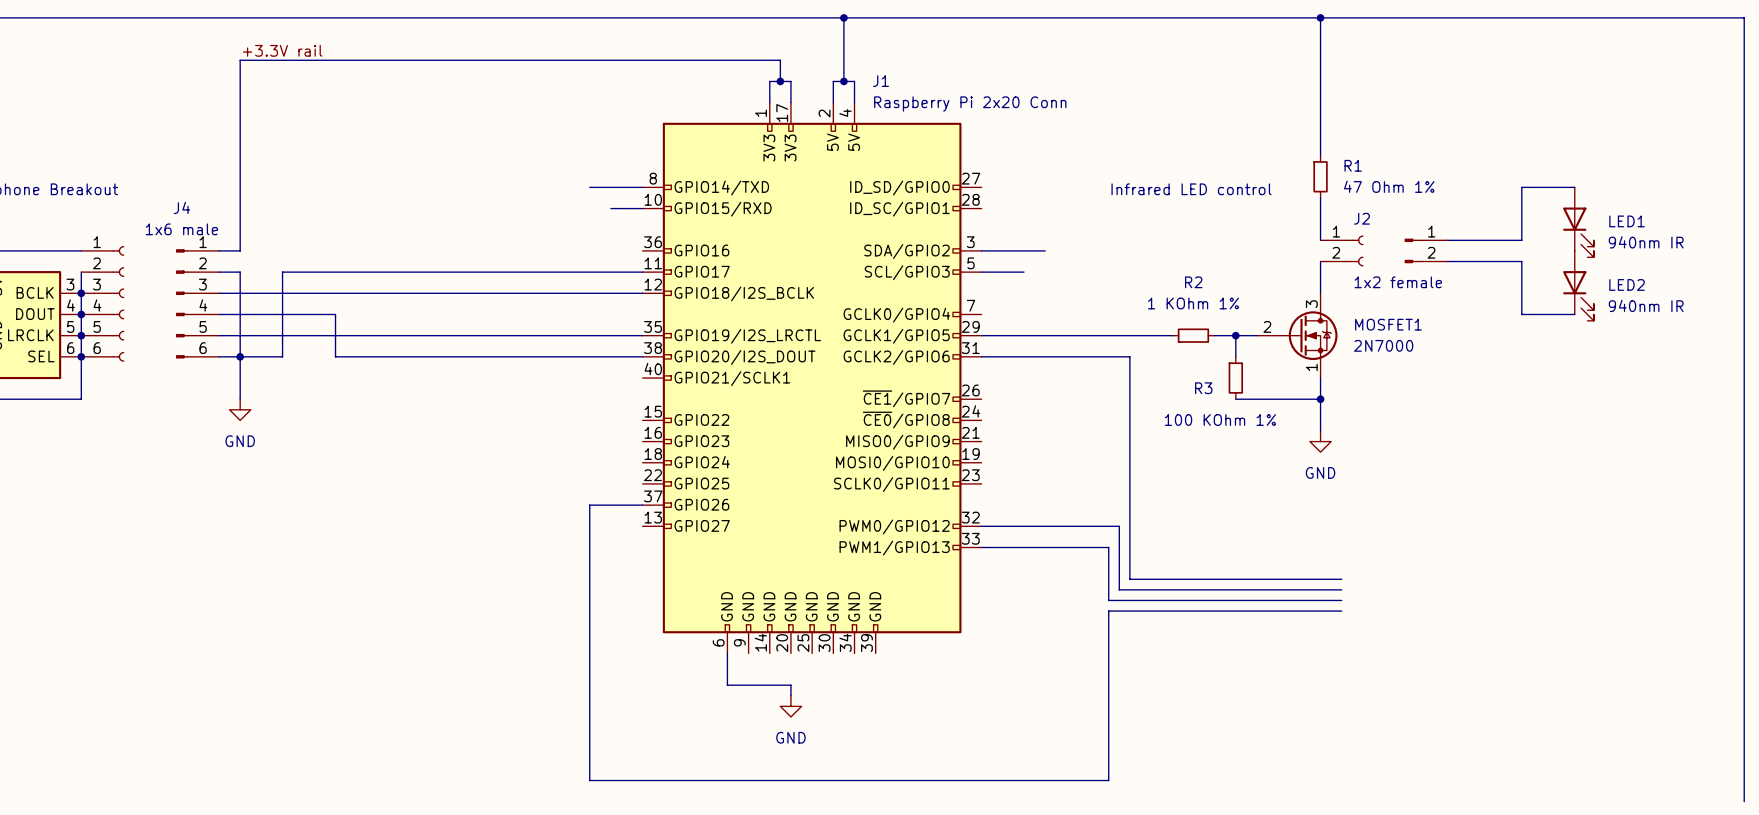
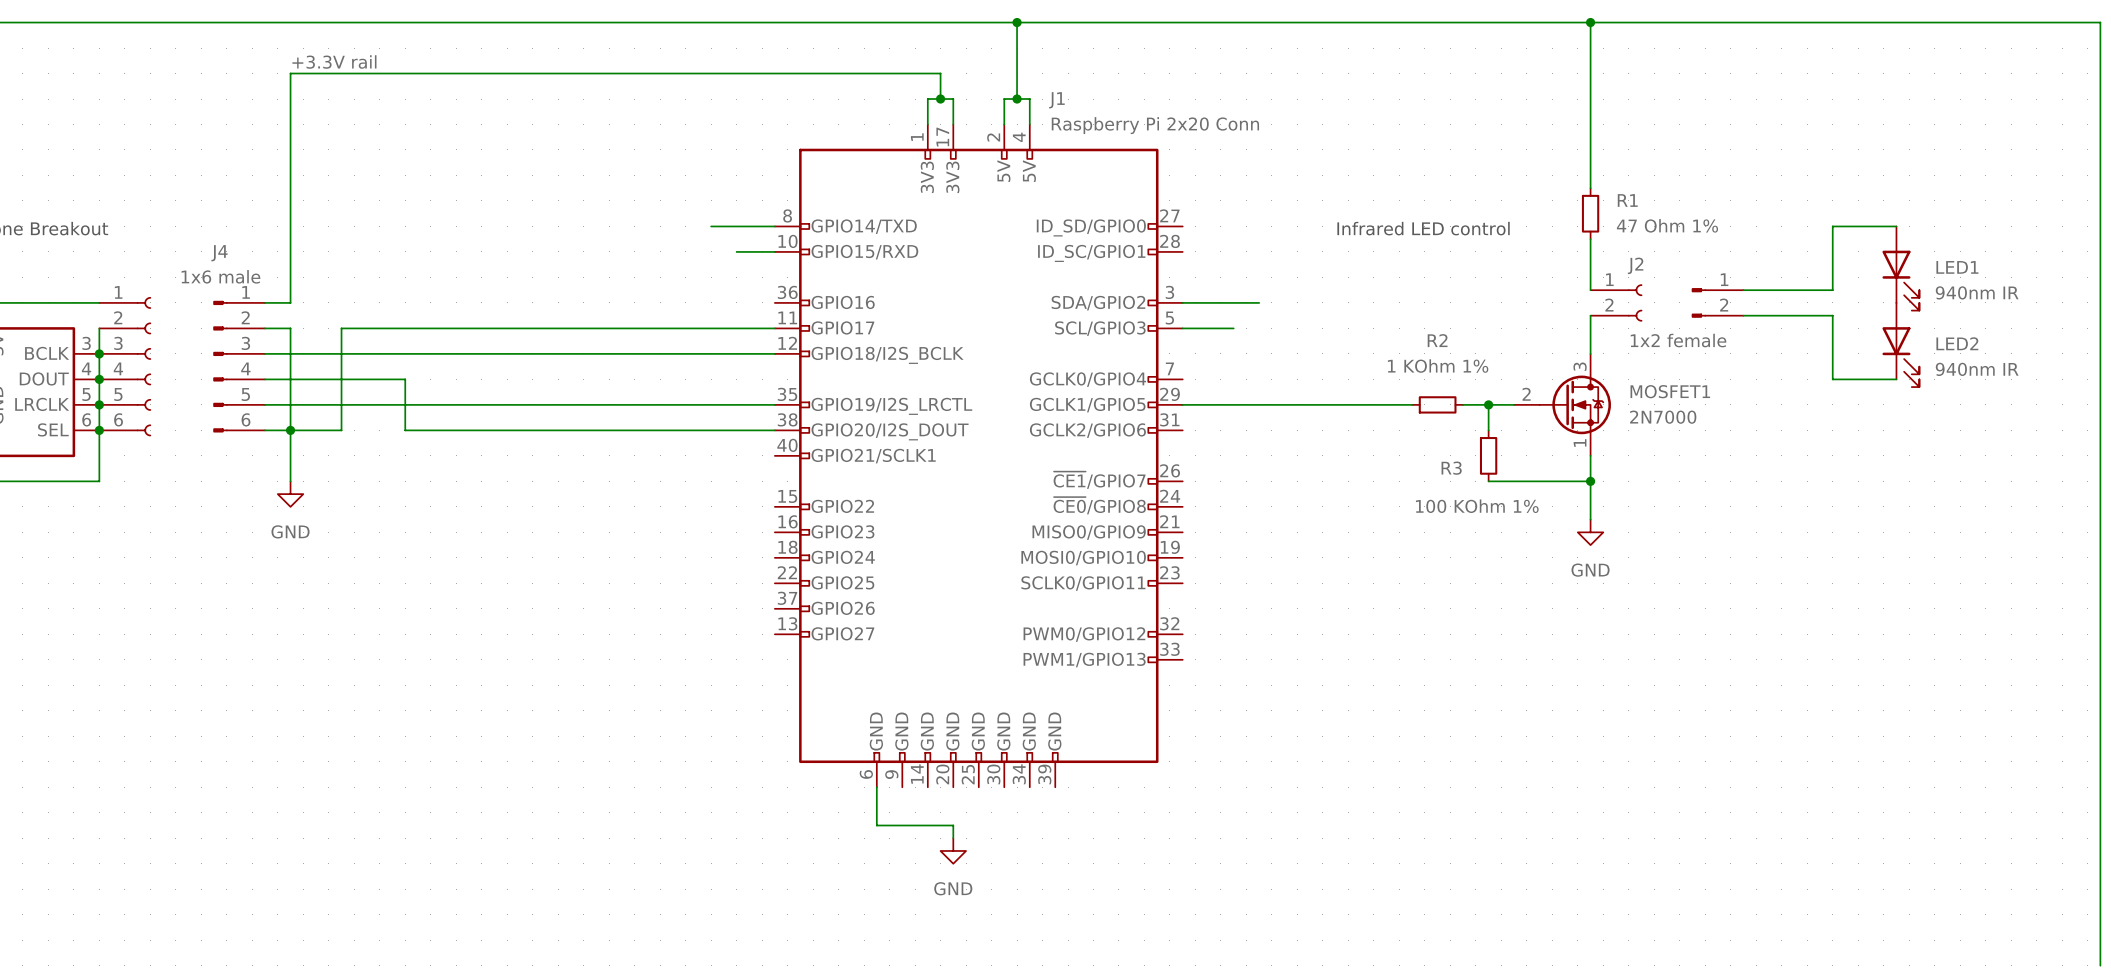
wire: (981, 356) (1129, 356) (1129, 579) (1341, 579) -> none
wire: (642, 505) (589, 505) (589, 780) (1108, 780) (1108, 611) (1341, 611) -> none
wire: (981, 526) (1119, 526) (1119, 589) (1341, 589) -> none
wire: (981, 547) (1108, 547) (1108, 600) (1341, 600) -> none

